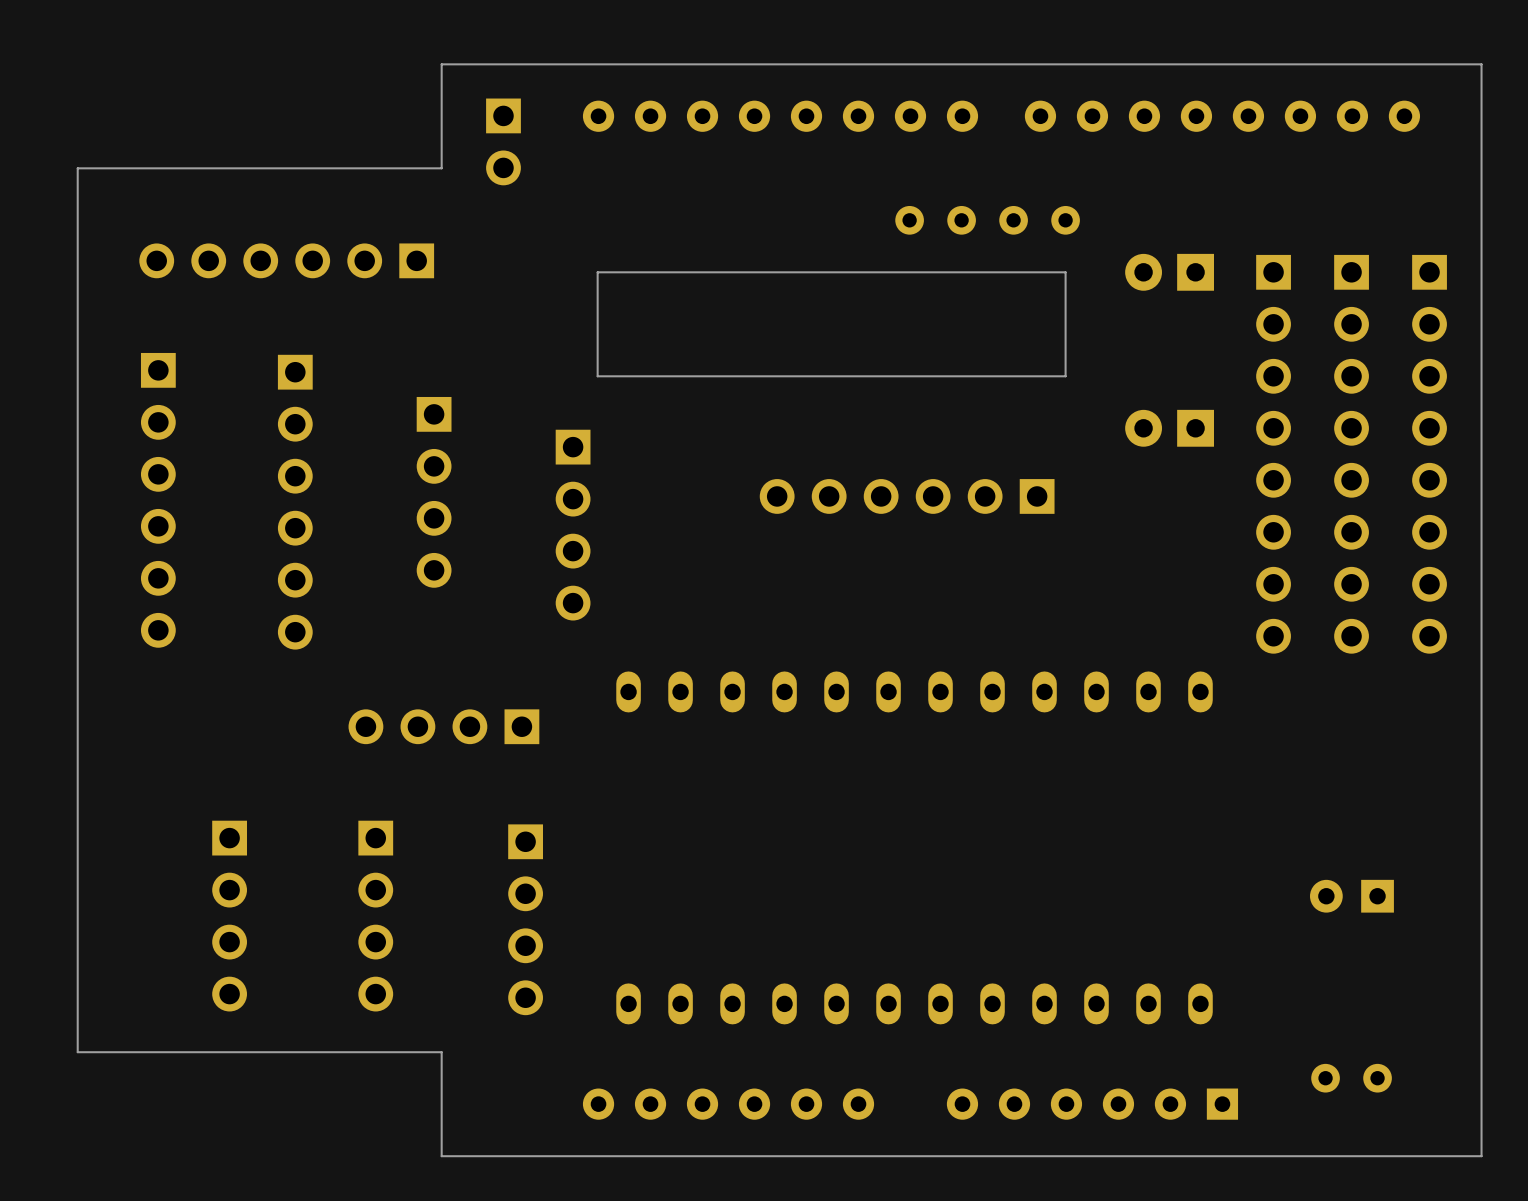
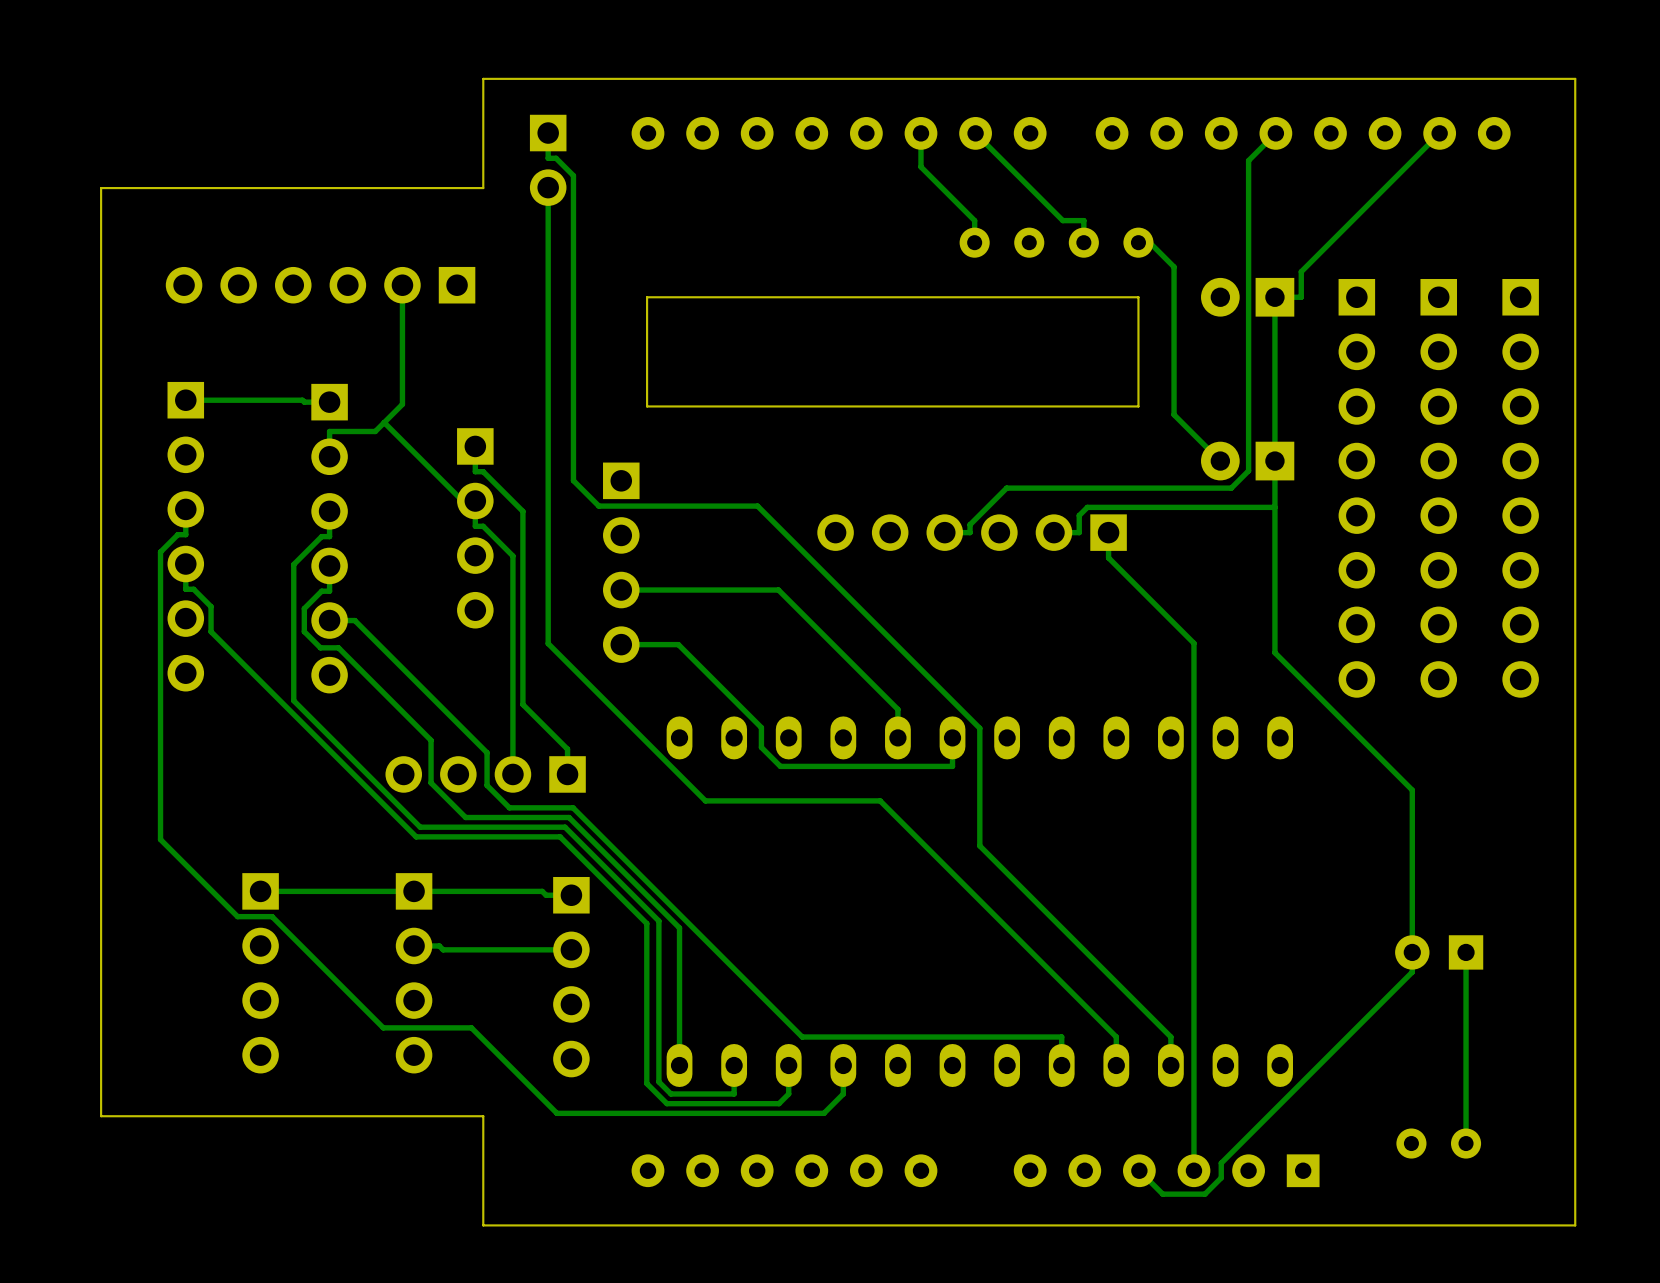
track: none -> (548, 133) (548, 158) (556, 158) (573, 175) (573, 480) (598, 506) (757, 506) (979, 728) (979, 845) (1170, 1037) (1170, 1065)
track: none -> (920, 133) (920, 166) (974, 220) (974, 242)
track: none -> (975, 133) (1062, 220) (1083, 220) (1083, 242)
track: none -> (1275, 133) (1248, 160) (1248, 470) (1231, 488) (1006, 488) (970, 524) (970, 532) (944, 532)
track: none -> (1439, 133) (1301, 271) (1301, 297) (1274, 297) (1274, 652) (1412, 790) (1412, 972) (1221, 1163) (1221, 1177) (1204, 1194) (1162, 1194) (1139, 1170)
track: none -> (548, 187) (548, 643) (705, 800) (880, 800) (1116, 1037) (1116, 1065)
track: none -> (1138, 242) (1149, 242) (1174, 266) (1174, 414) (1220, 461)
track: none -> (402, 285) (402, 404) (375, 431) (329, 431) (329, 456)
track: none -> (185, 400) (302, 400) (304, 402) (329, 402)
track: none -> (384, 422) (475, 513)
track: none -> (475, 446) (475, 471) (483, 471) (522, 511) (522, 704) (567, 749) (567, 774)
track: none -> (475, 501) (475, 526) (483, 526) (512, 556) (512, 774)
track: none -> (1274, 507) (1087, 507) (1079, 515) (1079, 532) (1053, 532)
track: none -> (185, 509) (185, 534) (177, 534) (160, 552) (160, 839) (237, 916) (272, 916) (383, 1027) (471, 1027) (556, 1113) (823, 1113) (843, 1093) (843, 1065)
track: none -> (329, 511) (329, 536) (321, 536) (293, 564) (293, 700) (420, 827) (565, 827) (658, 921) (658, 1081) (670, 1093) (734, 1093) (734, 1065)
track: none -> (1108, 532) (1108, 557) (1193, 643) (1193, 1170)
track: none -> (185, 564) (185, 589) (193, 589) (211, 606) (211, 631) (416, 836) (560, 836) (646, 923) (646, 1083) (666, 1103) (779, 1103) (788, 1093) (788, 1065)
track: none -> (329, 565) (329, 591) (321, 591) (304, 608) (304, 631) (320, 647) (338, 647) (431, 740) (431, 782) (465, 817) (569, 817) (679, 927) (679, 1065)
track: none -> (621, 590) (778, 590) (897, 709) (897, 737)
track: none -> (329, 620) (354, 620) (487, 752) (487, 785) (509, 807) (573, 807) (802, 1037) (1061, 1037) (1061, 1065)
track: none -> (621, 644) (678, 644) (761, 727) (761, 747) (780, 766) (952, 766) (952, 737)
track: none -> (260, 891) (542, 891) (546, 895) (571, 895)
track: none -> (414, 945) (439, 945) (443, 949) (571, 949)
track: none -> (1466, 952) (1466, 1143)

